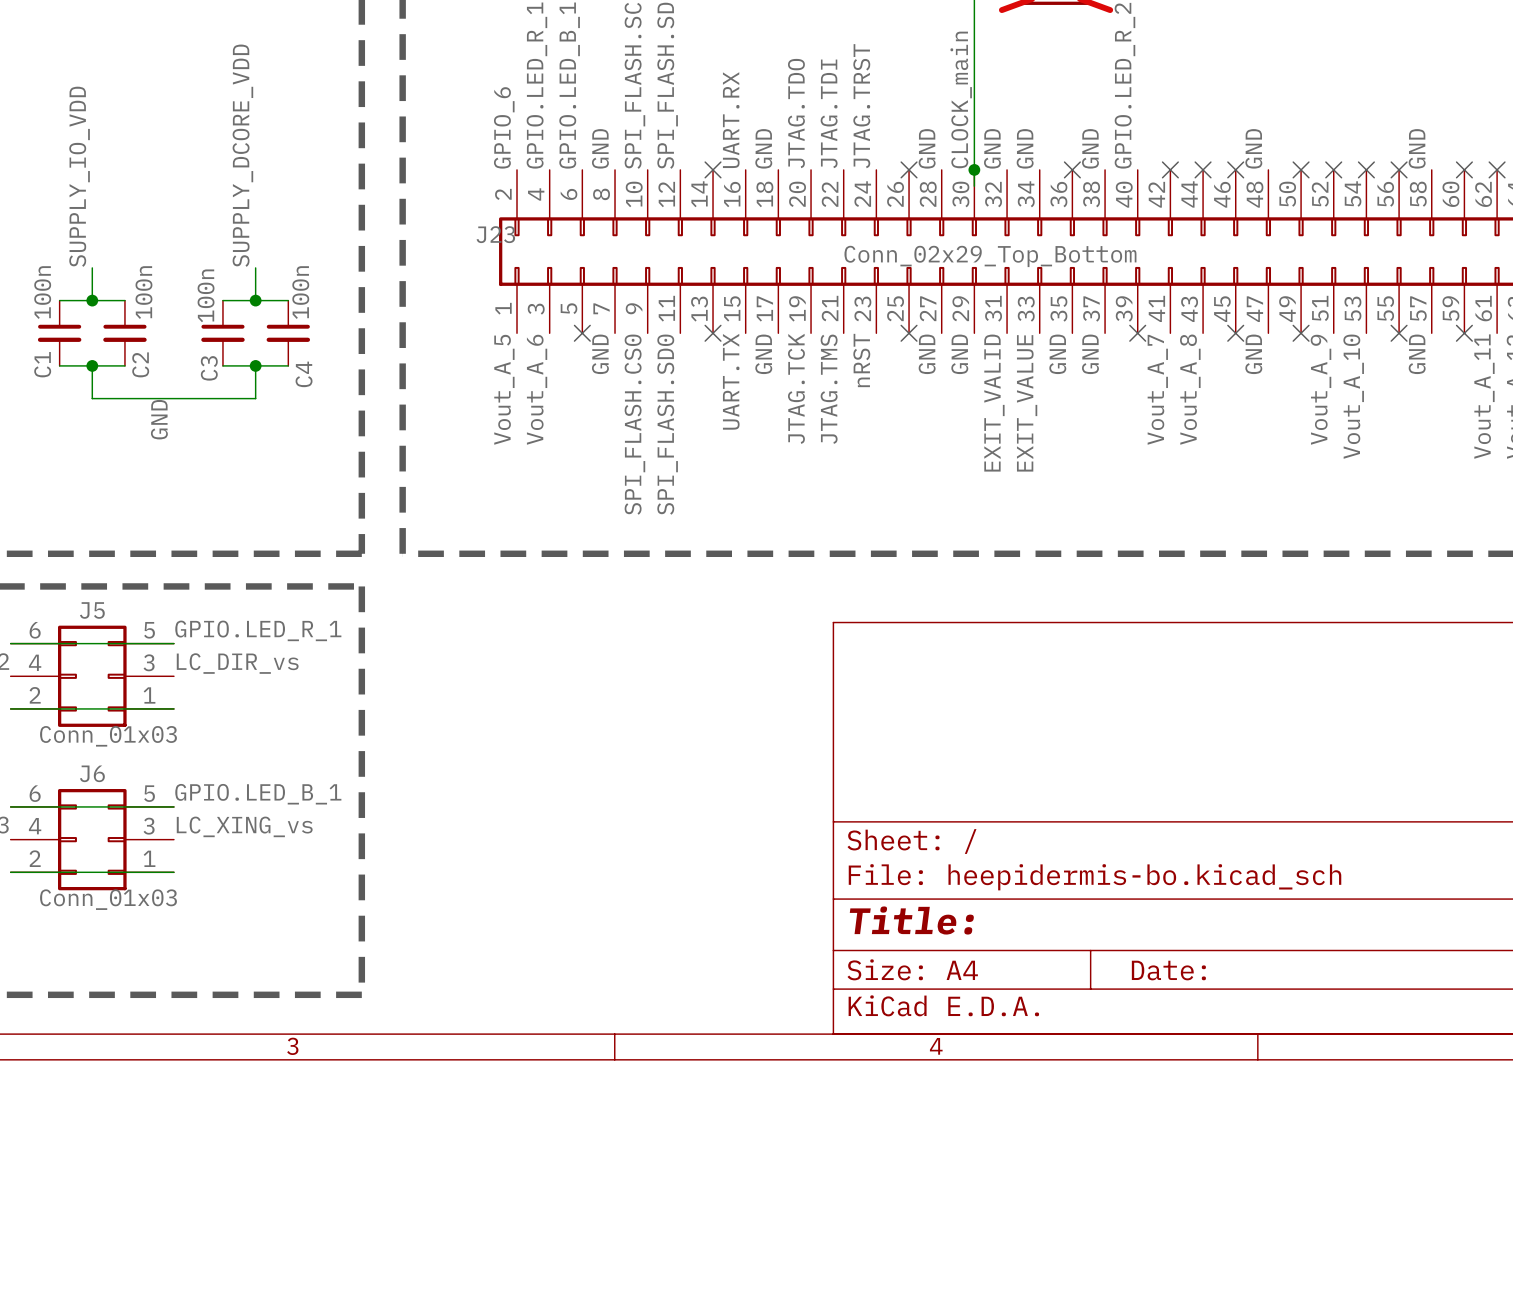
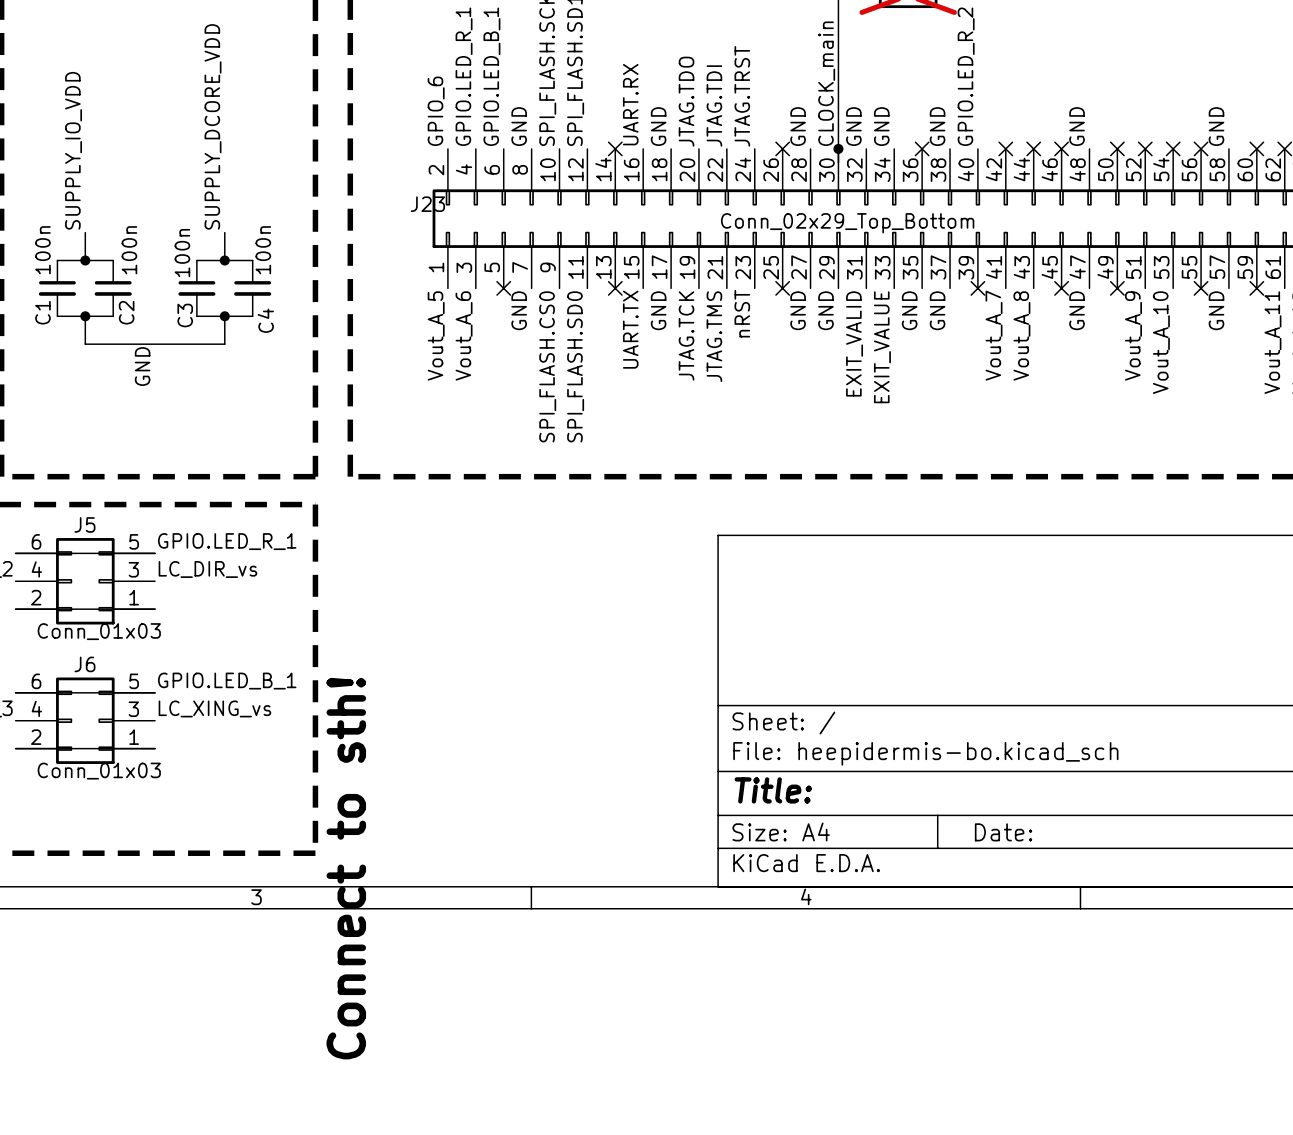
text: none -> Connect to sth! (346, 868)

